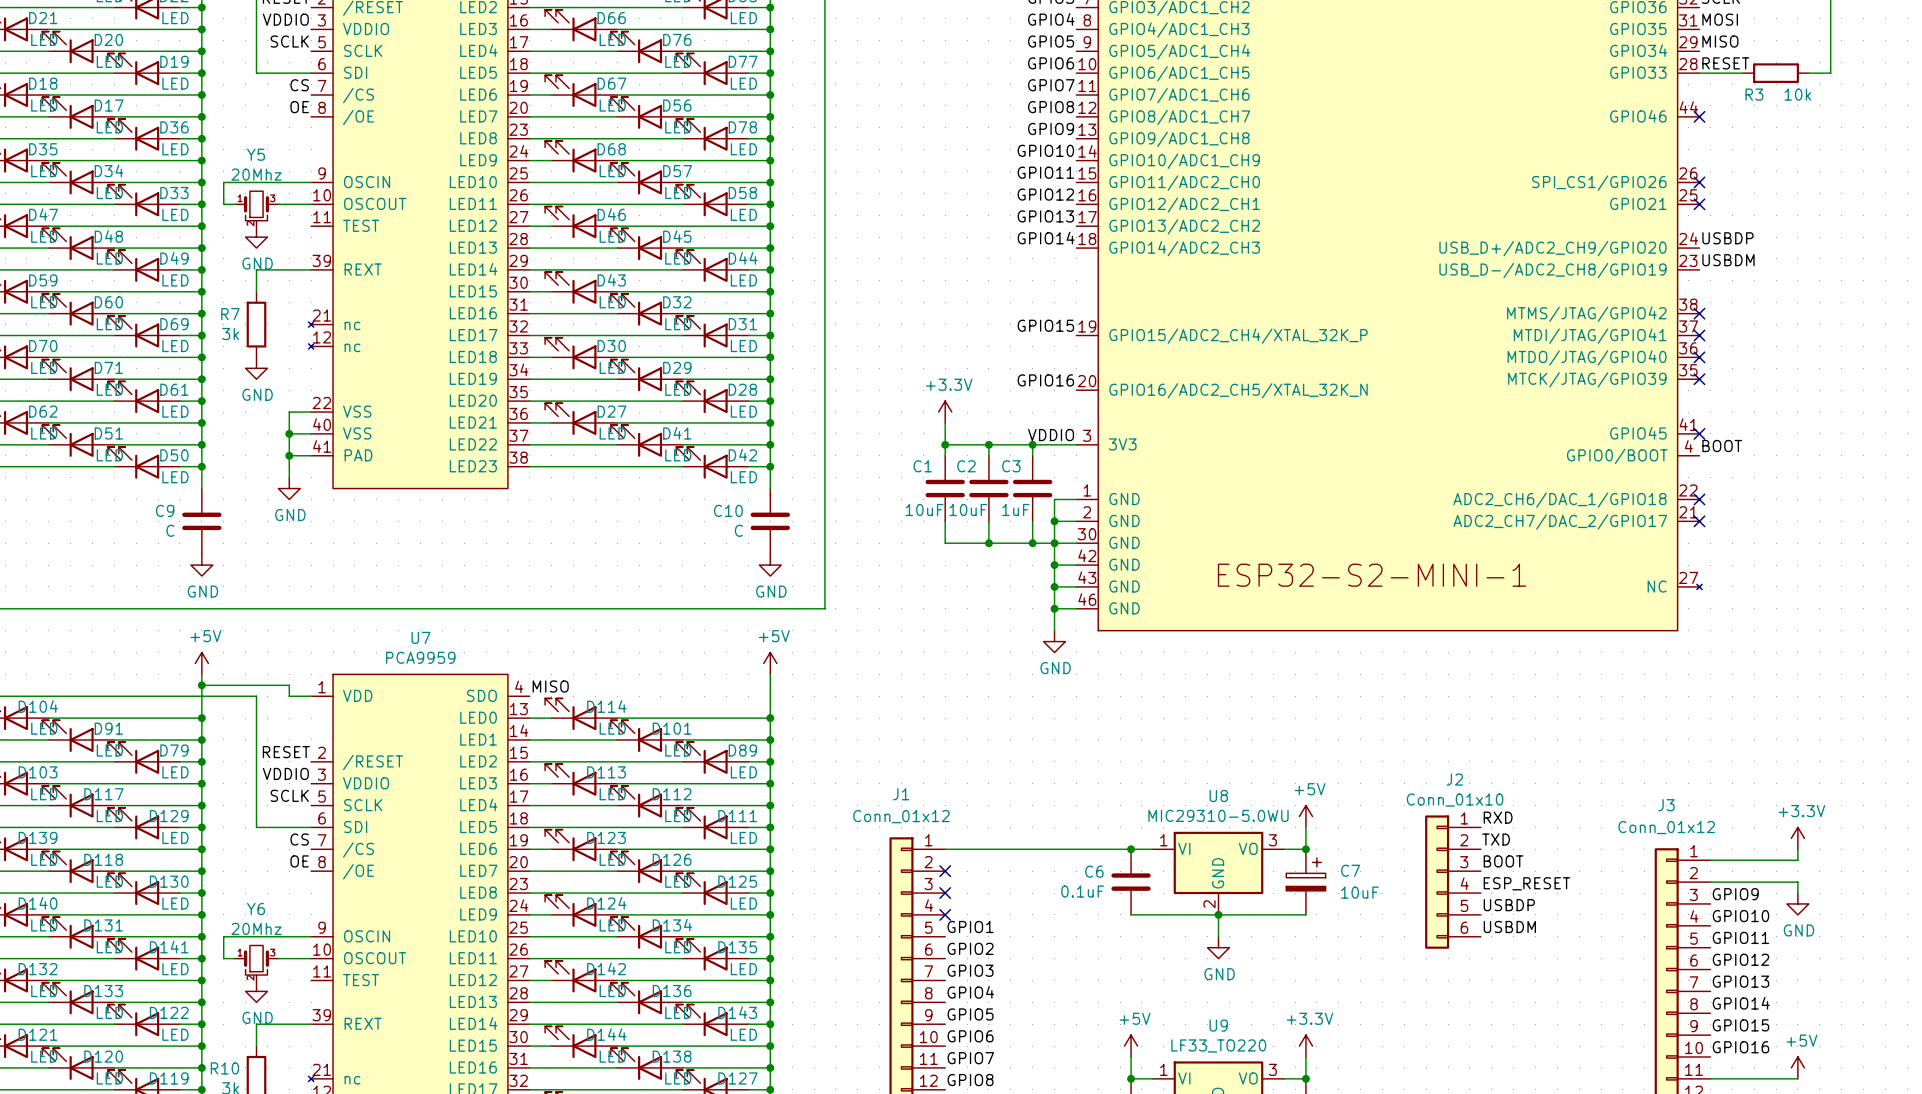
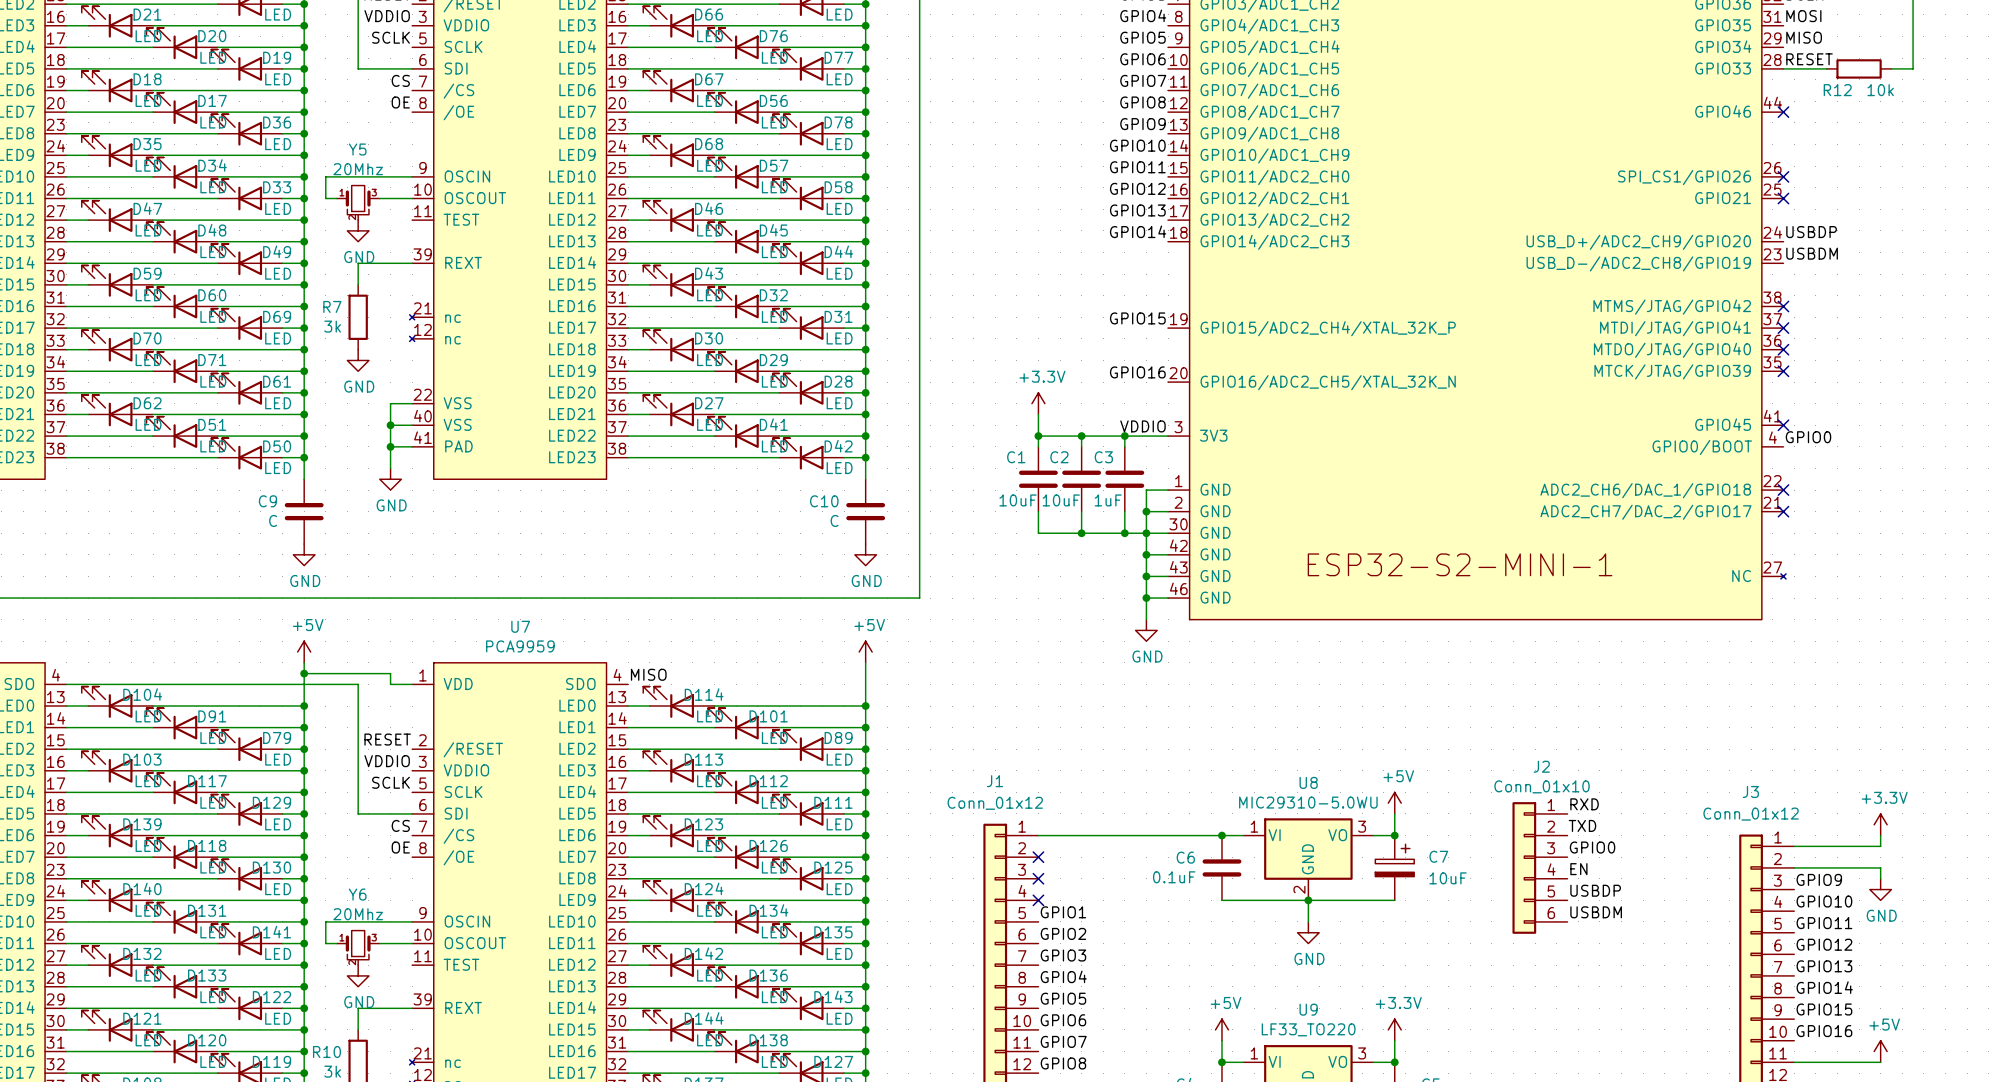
R3 name: R3 (1754, 94) -> R12 (1837, 90)
label: BOOT (1722, 446) -> GPIO0 (1808, 437)
label: BOOT (1503, 861) -> GPIO0 (1592, 847)
label: ESP_RESET (1527, 883) -> EN (1578, 869)

